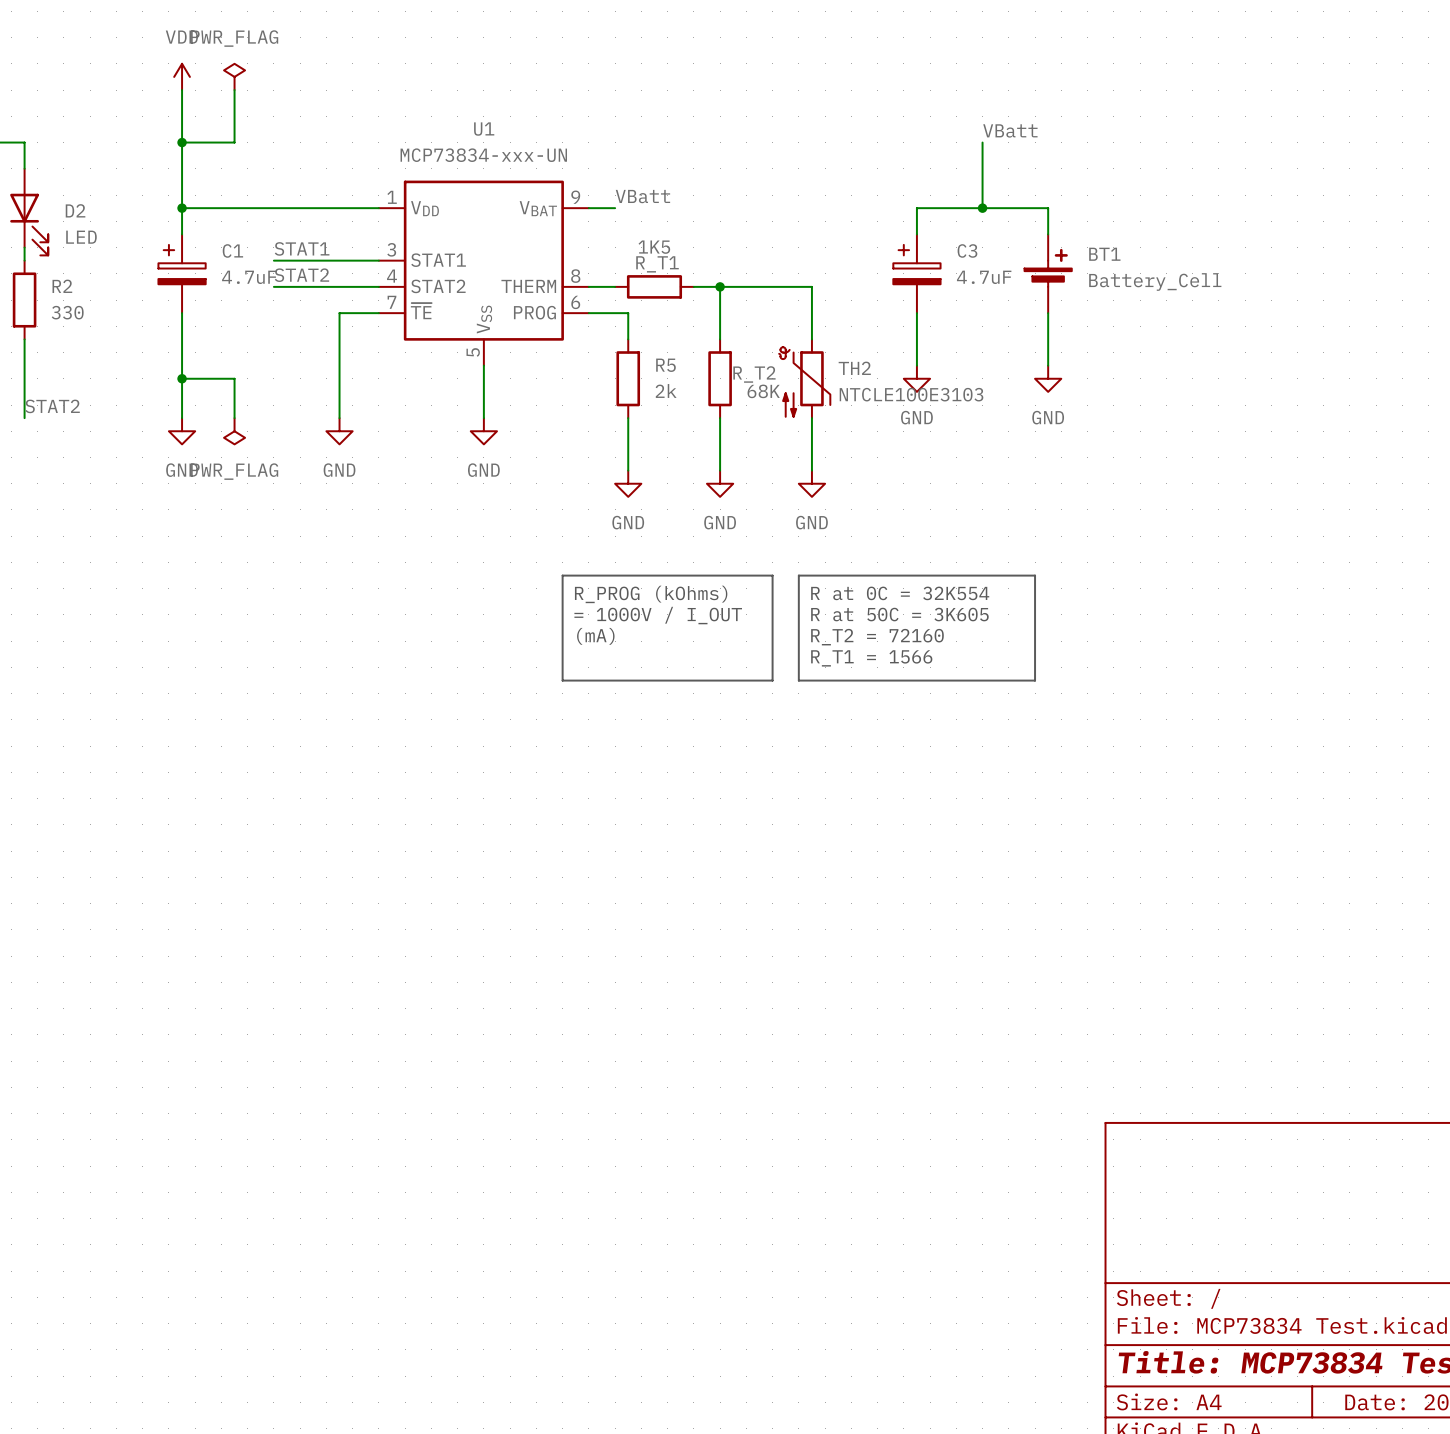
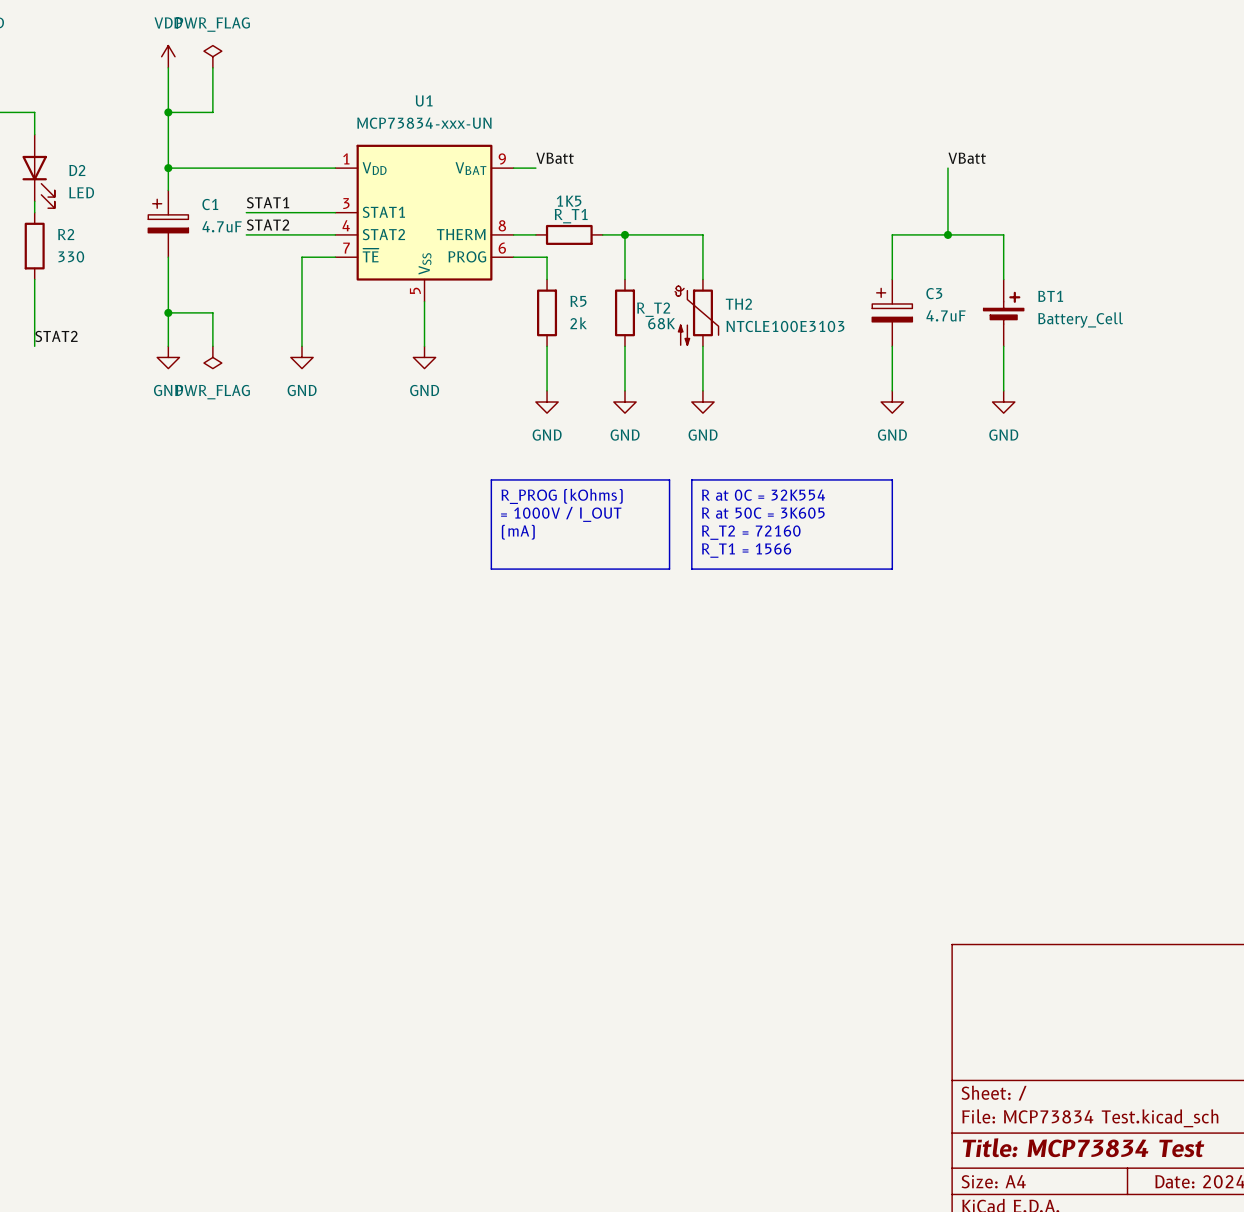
label position: VBatt (1010, 130) -> VBatt (967, 158)
wire: (982, 142) (982, 208) -> none
junction: (982, 208) -> none
wire: none -> (947, 168) (947, 234)
wire: (916, 234) (916, 208) (1048, 208) (1048, 234) -> none
C3 position: (916, 273) -> (892, 312)
BT1 position: (1048, 273) -> (1003, 312)
junction: none -> (947, 234)
wire: (916, 313) (916, 365) -> (892, 346) (892, 390)
wire: (1048, 313) (1048, 365) -> (1003, 346) (1003, 390)
wire: none -> (892, 279) (892, 234) (1003, 234) (1003, 279)
power symbol: GND (916, 378) -> none
power symbol: GND (1048, 378) -> none
power symbol: none -> GND (892, 402)
power symbol: none -> GND (1003, 402)

